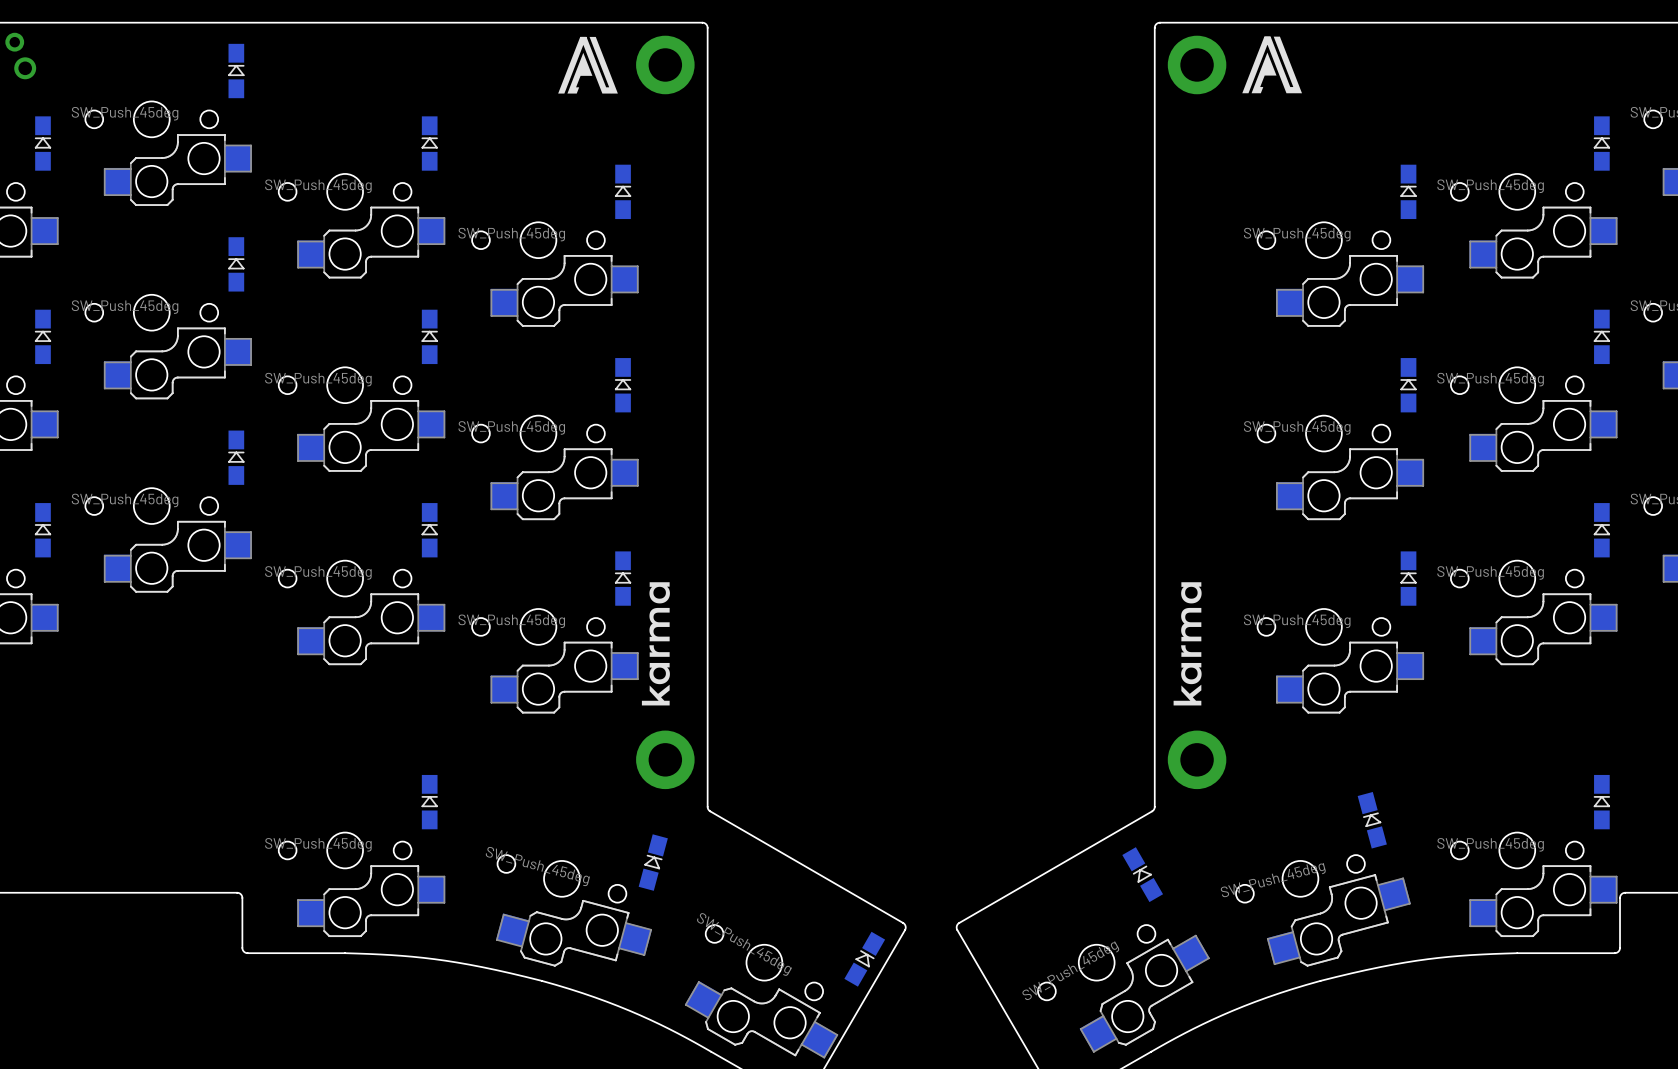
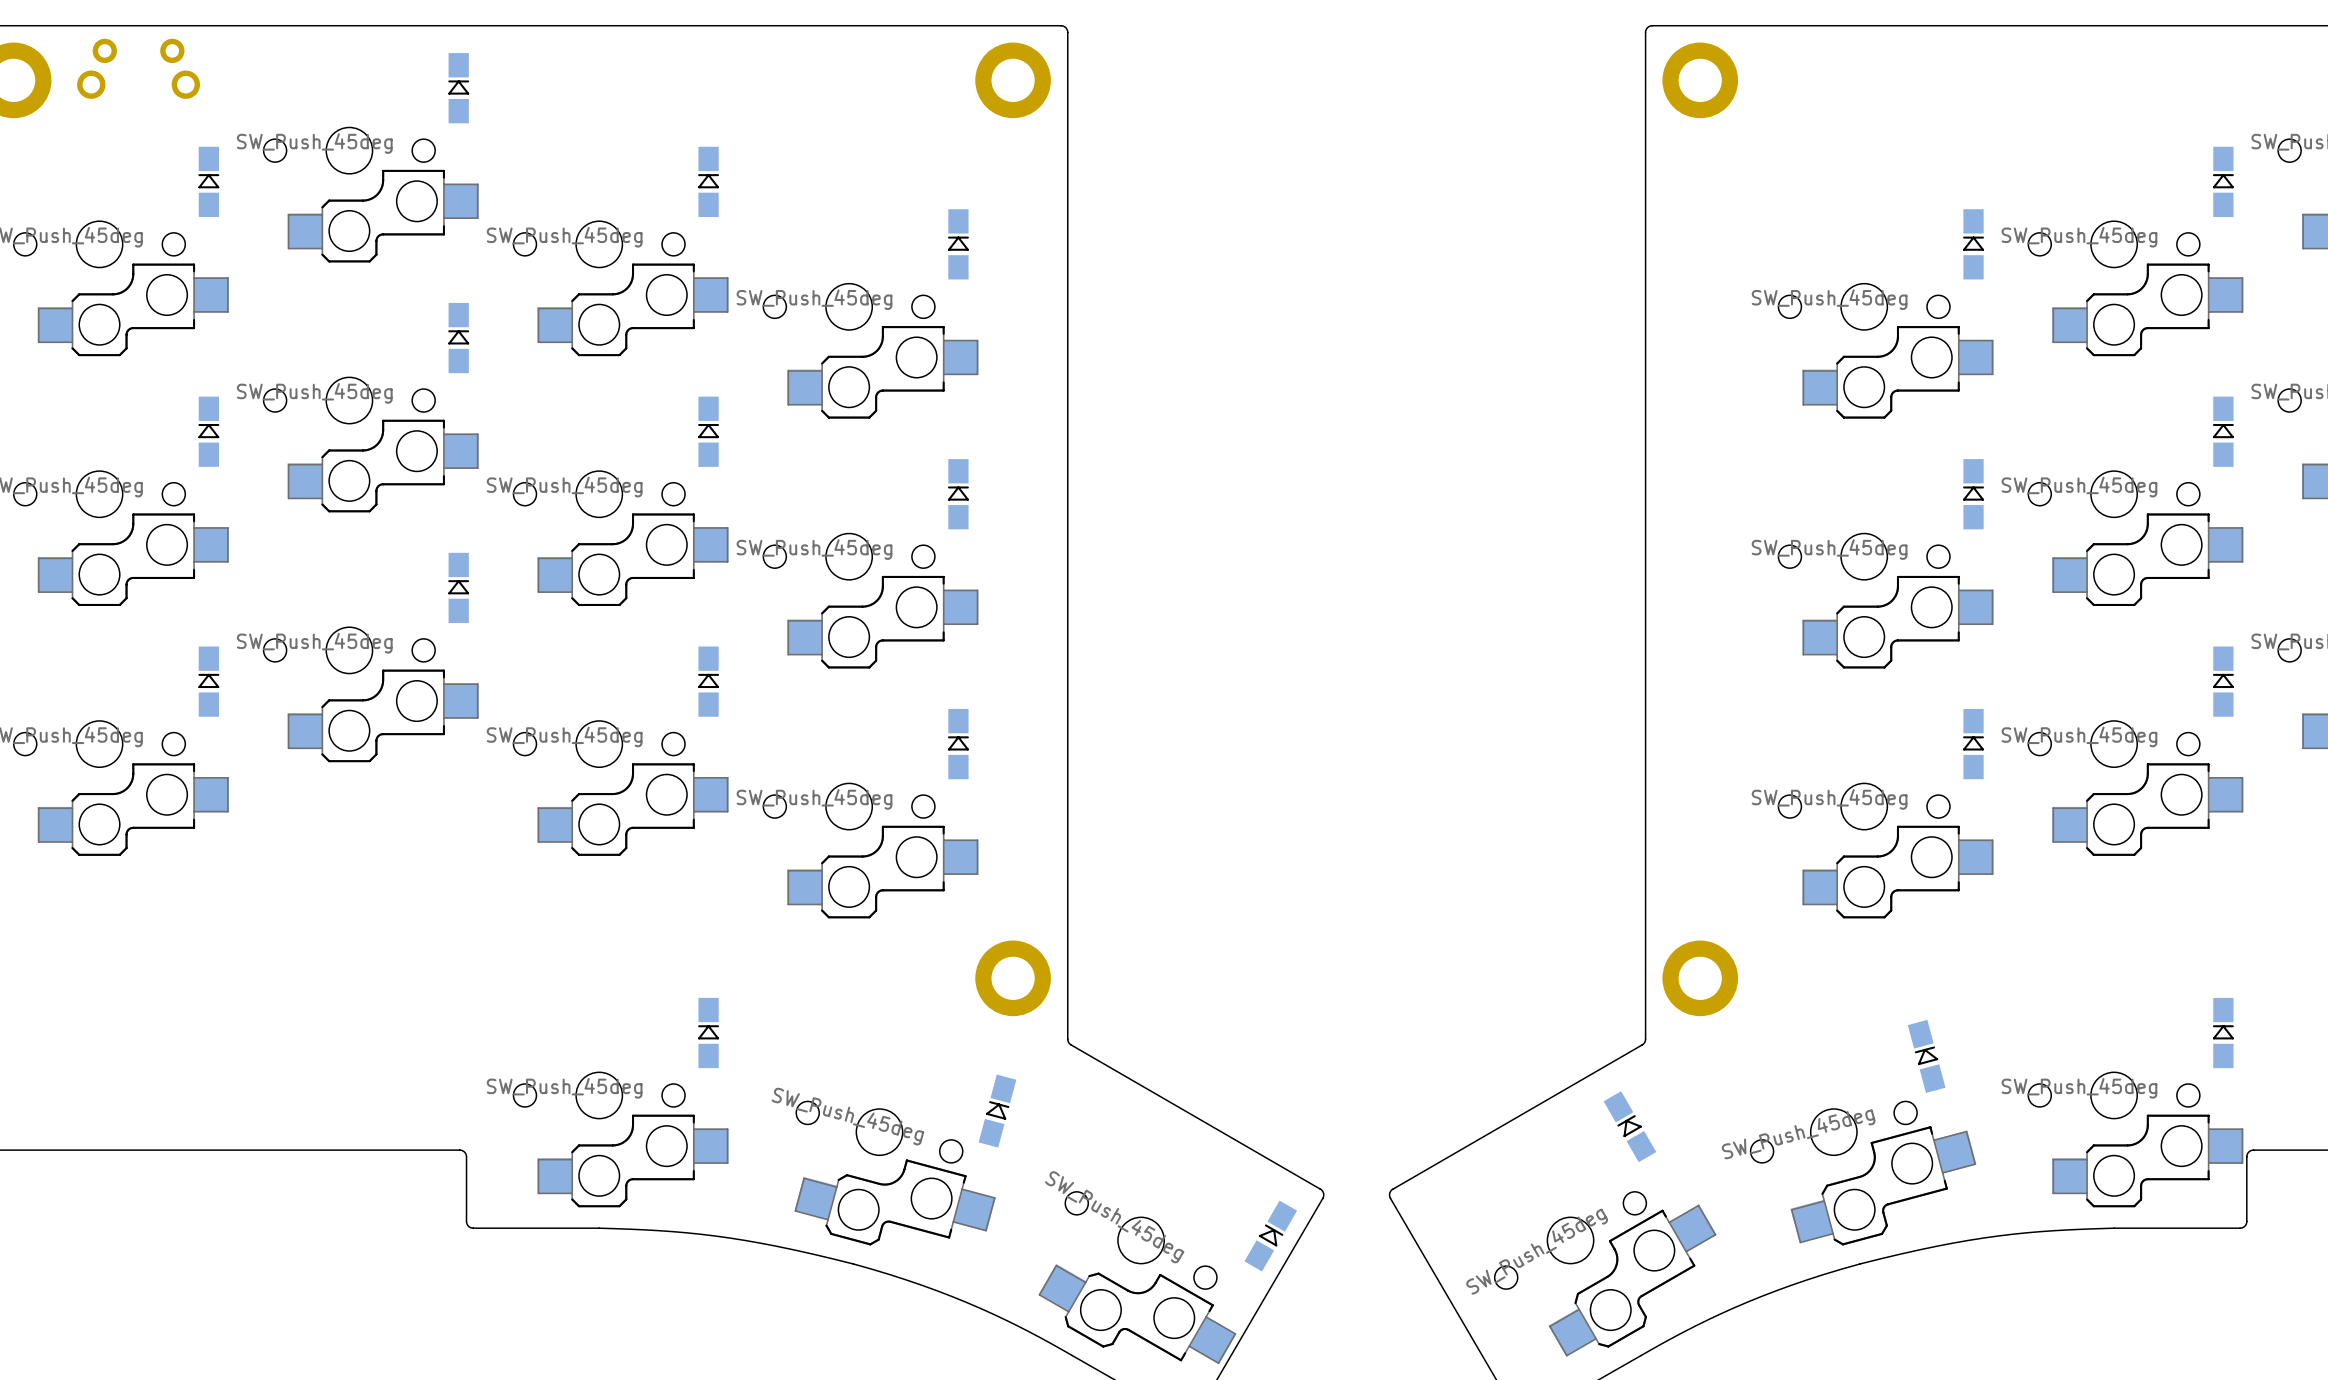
drawing: [558, 36, 618, 94] -> none
drawing: [1242, 36, 1302, 94] -> none
drawing: [641, 582, 670, 706] -> none
drawing: [1173, 582, 1202, 706] -> none

